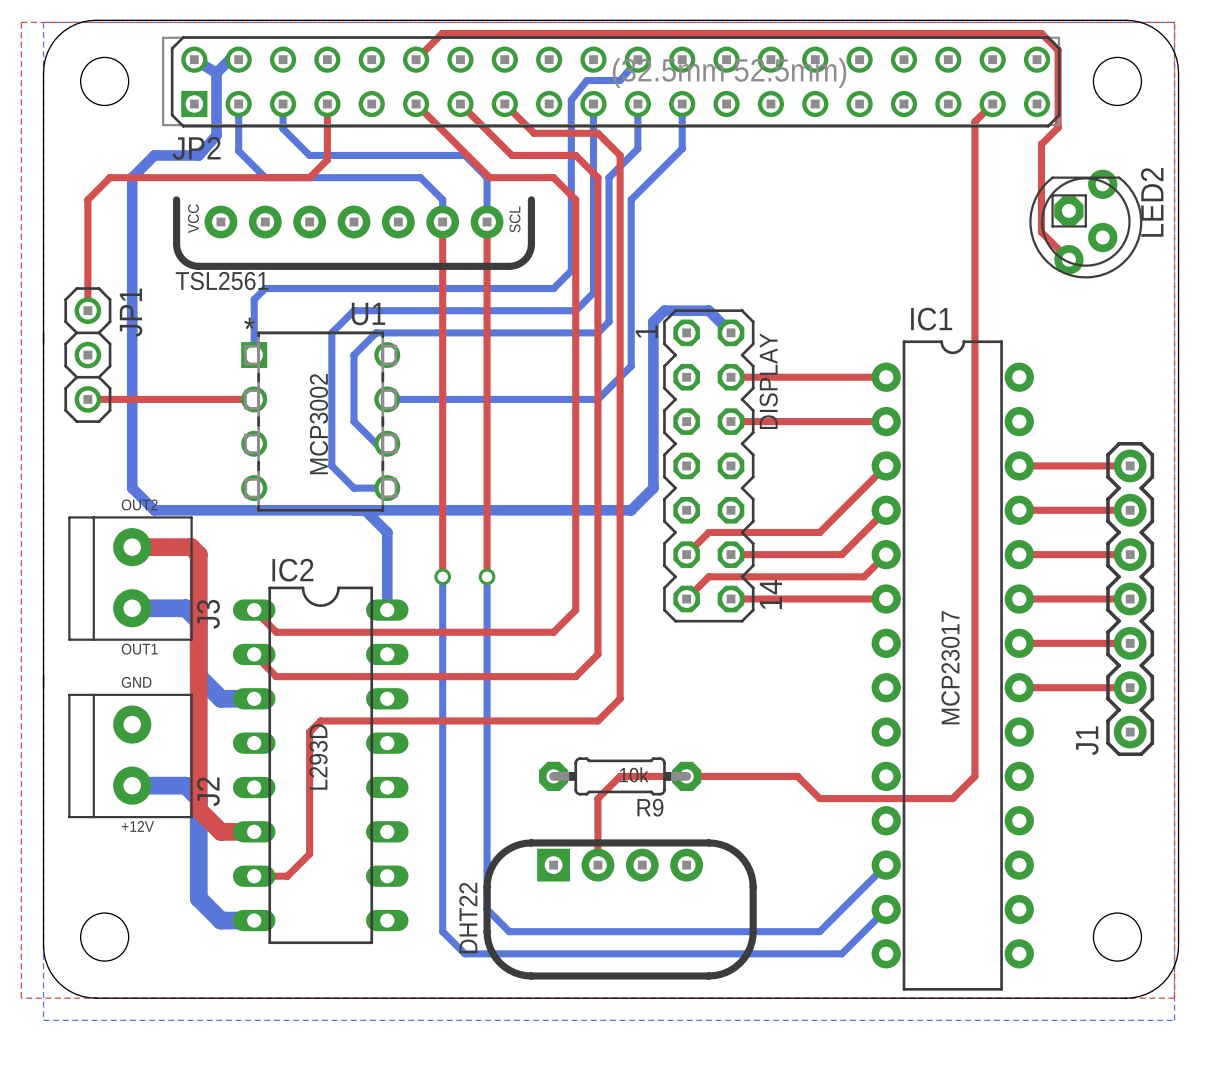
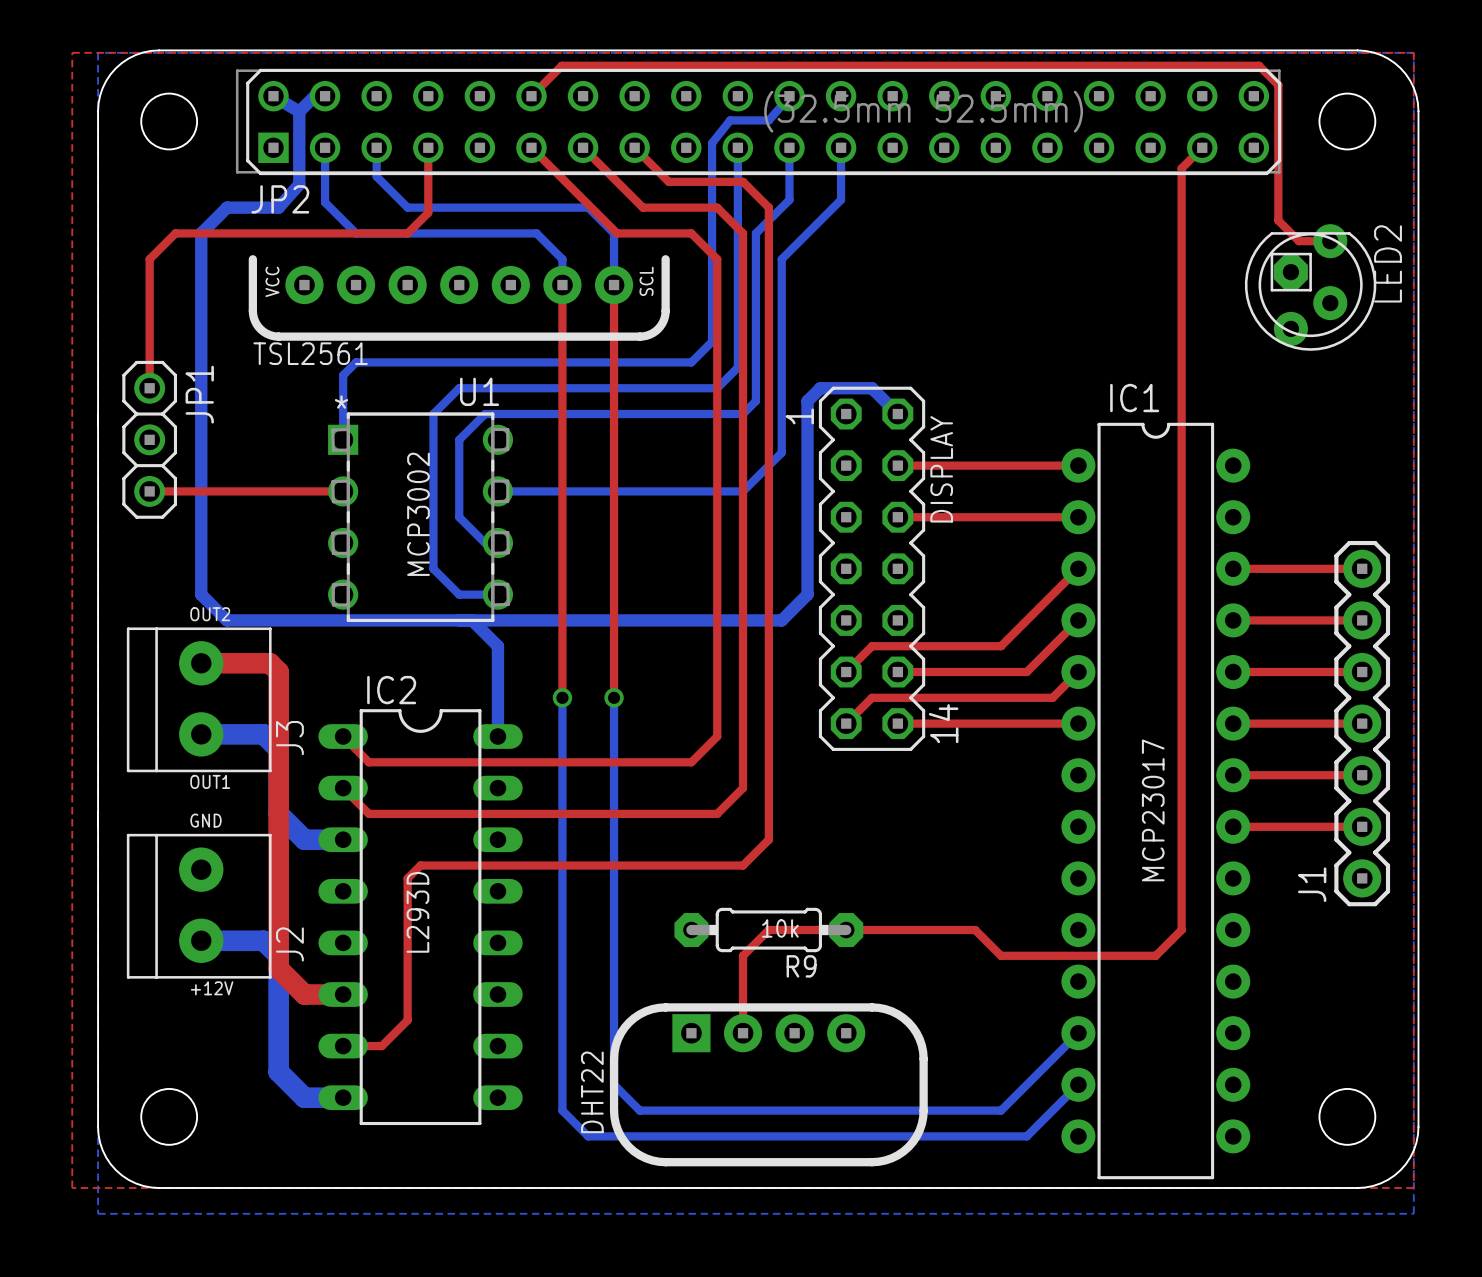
top track: (1058, 127) (1041, 144) (1041, 232) (1068, 259) -> (1278, 175) (1278, 220) (1299, 241) (1330, 241)

